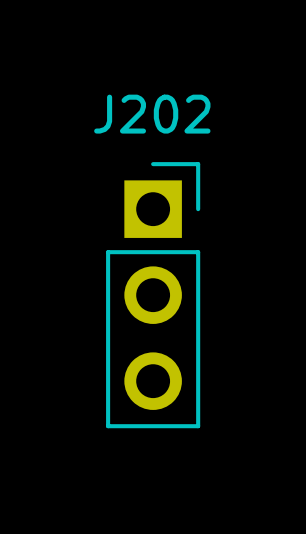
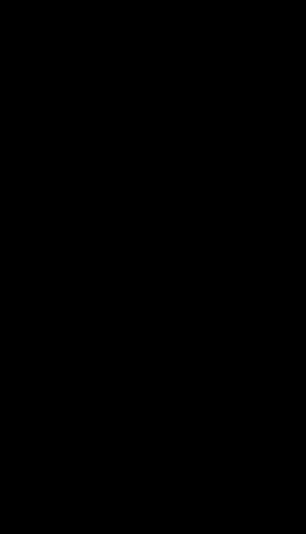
J202: (153, 295) -> none

